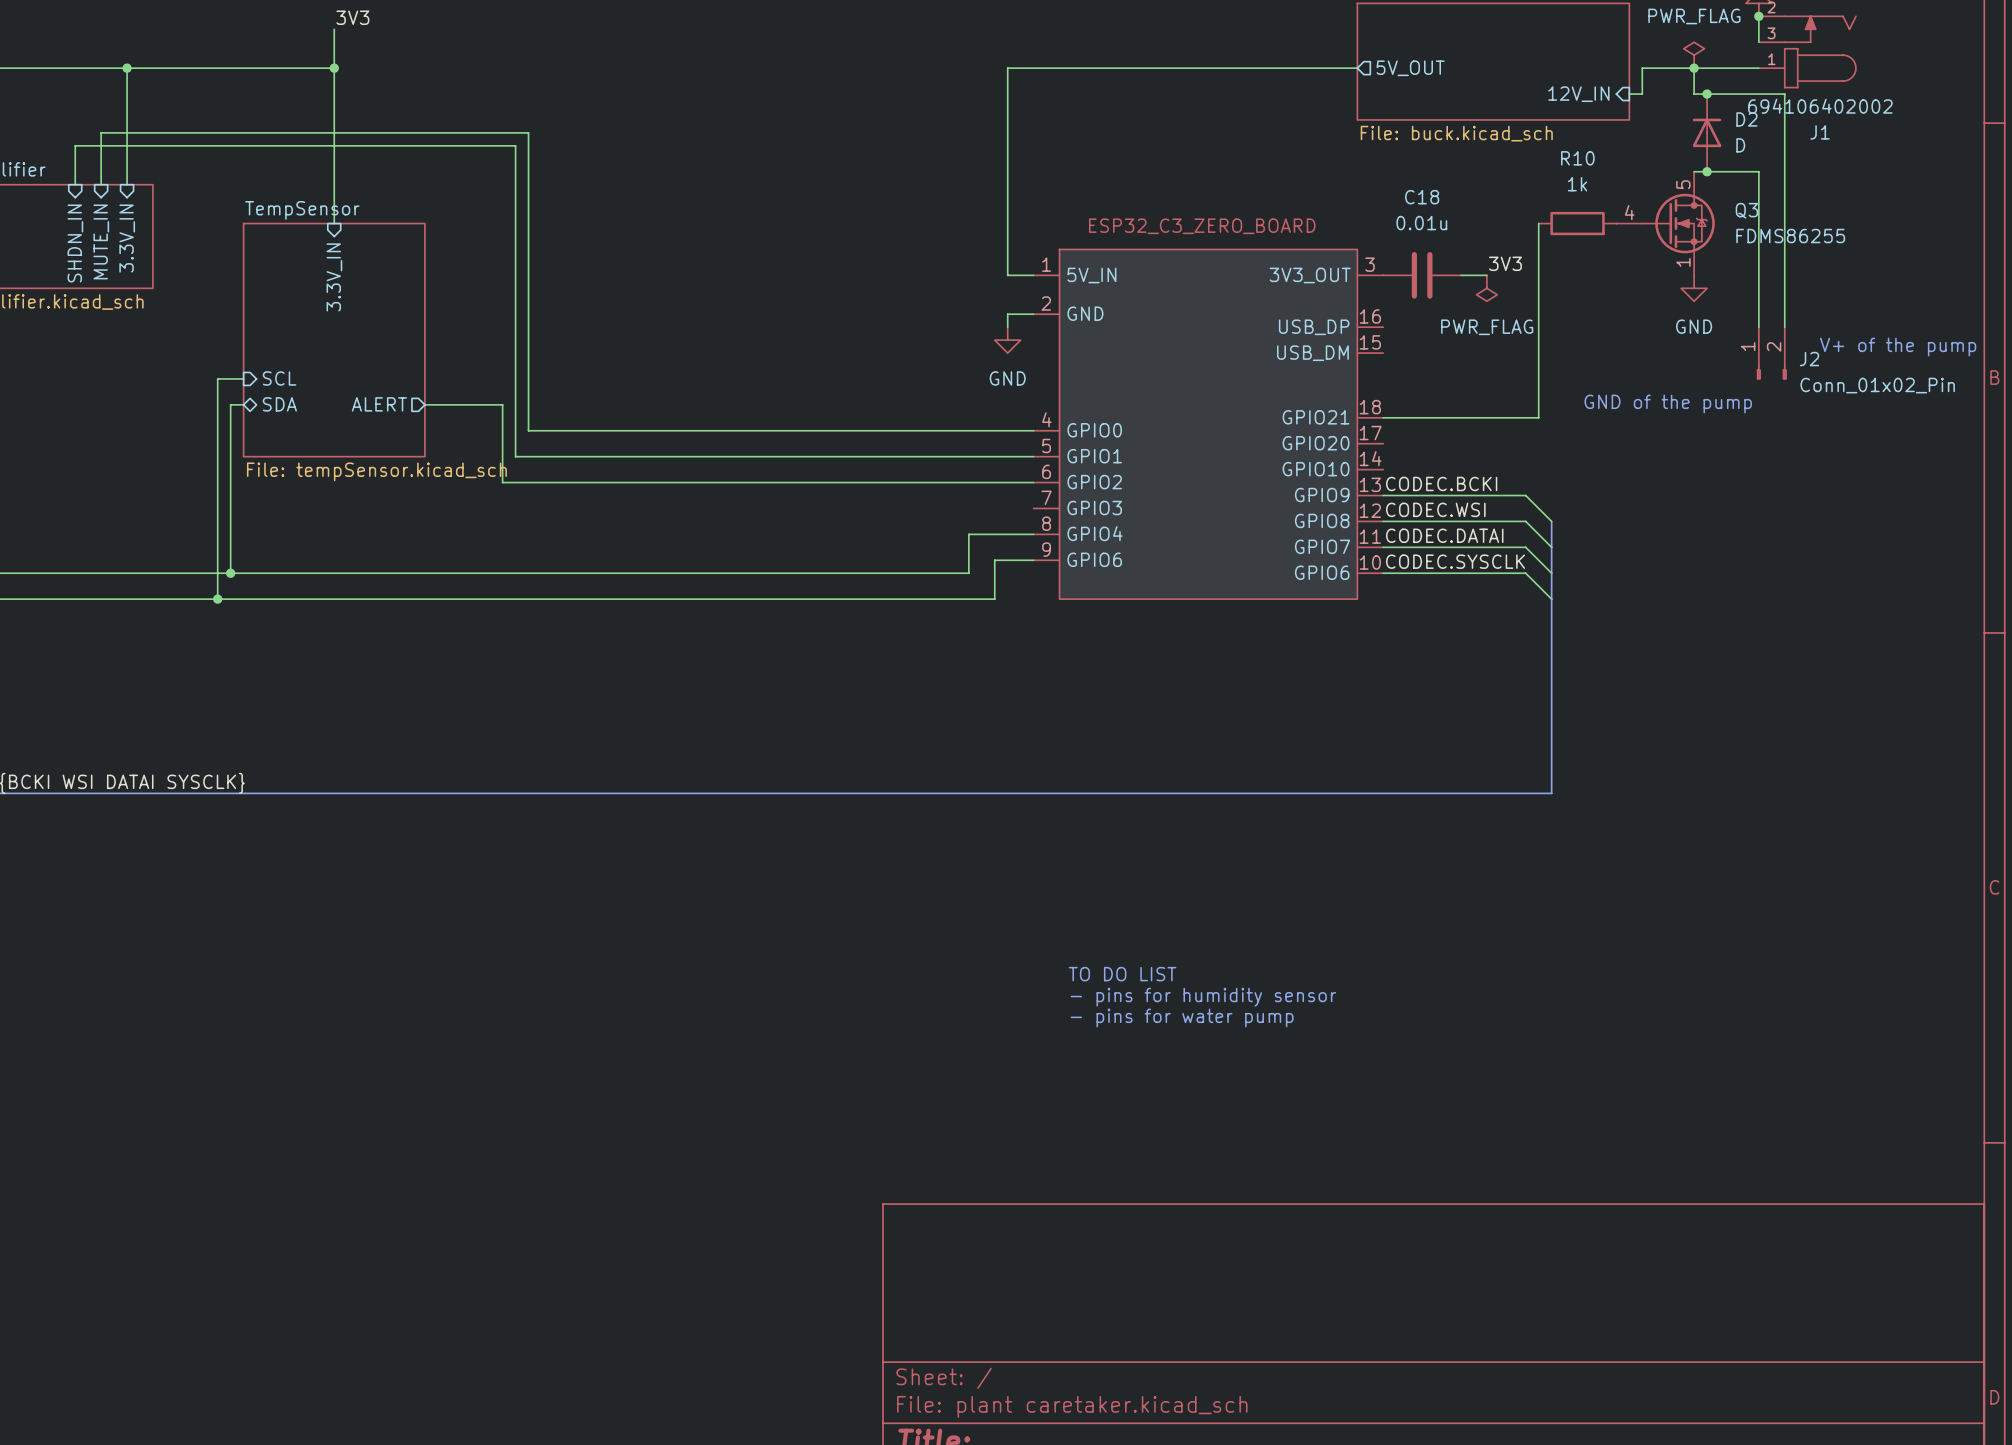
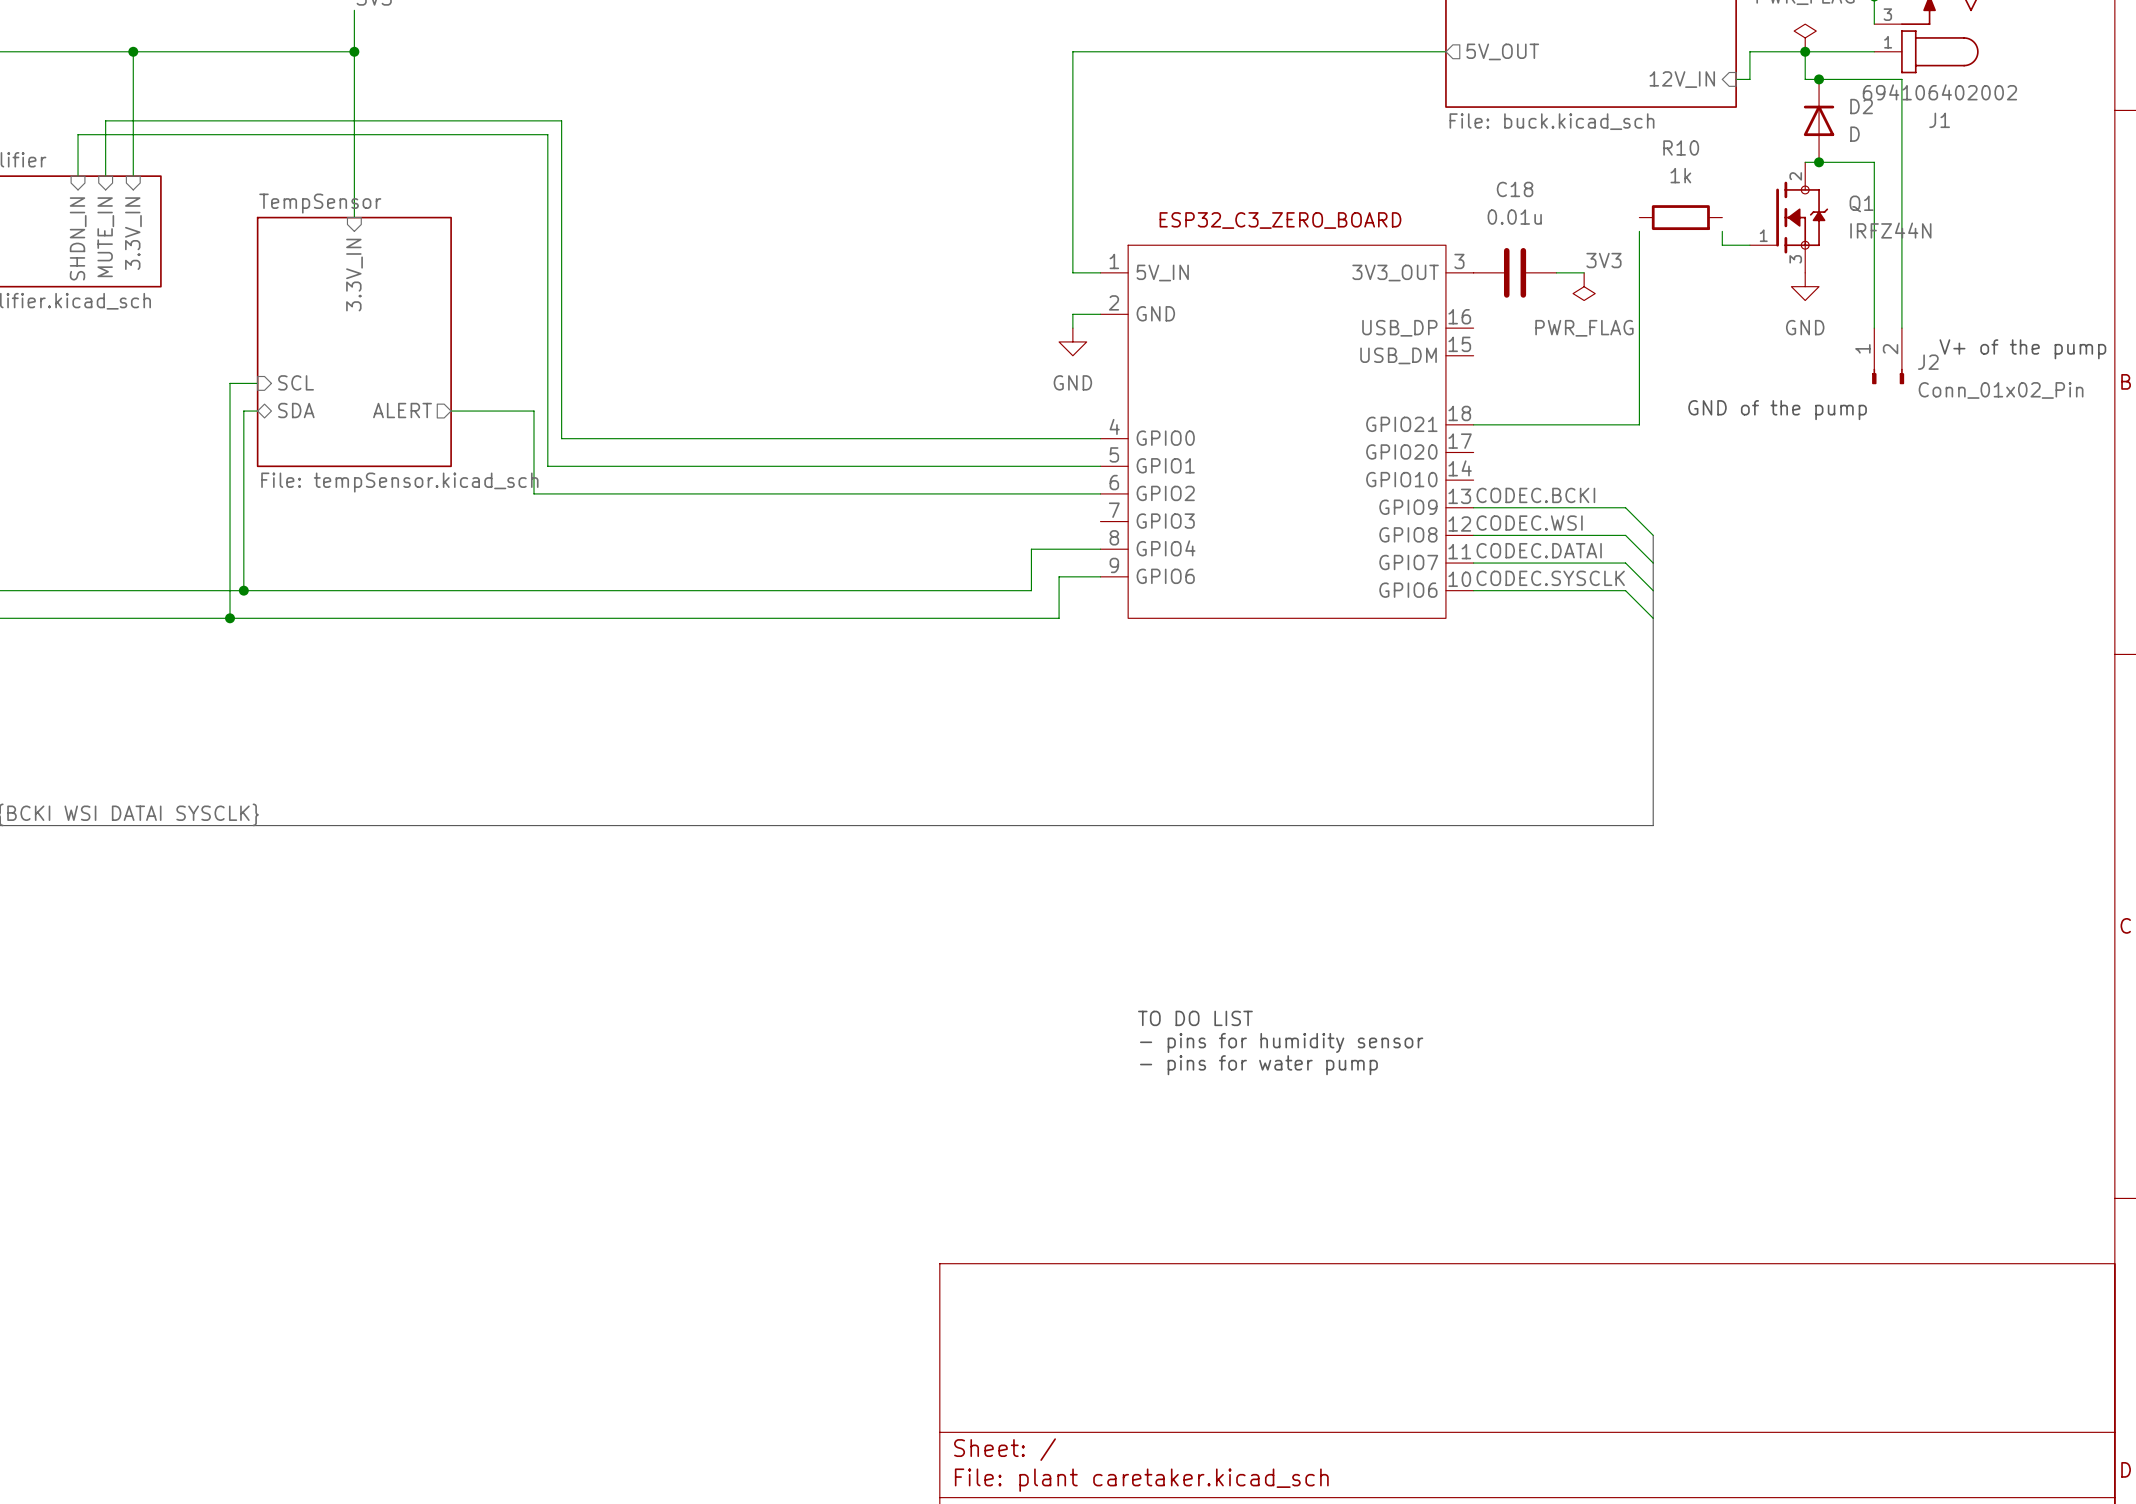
wire: (1538, 223) (1538, 236) -> none
Q3: FDMS86255 (1665, 223) -> none
Q1: none -> IRFZ44N (1789, 217)
wire: none -> (1722, 231) (1722, 245) (1749, 245)

